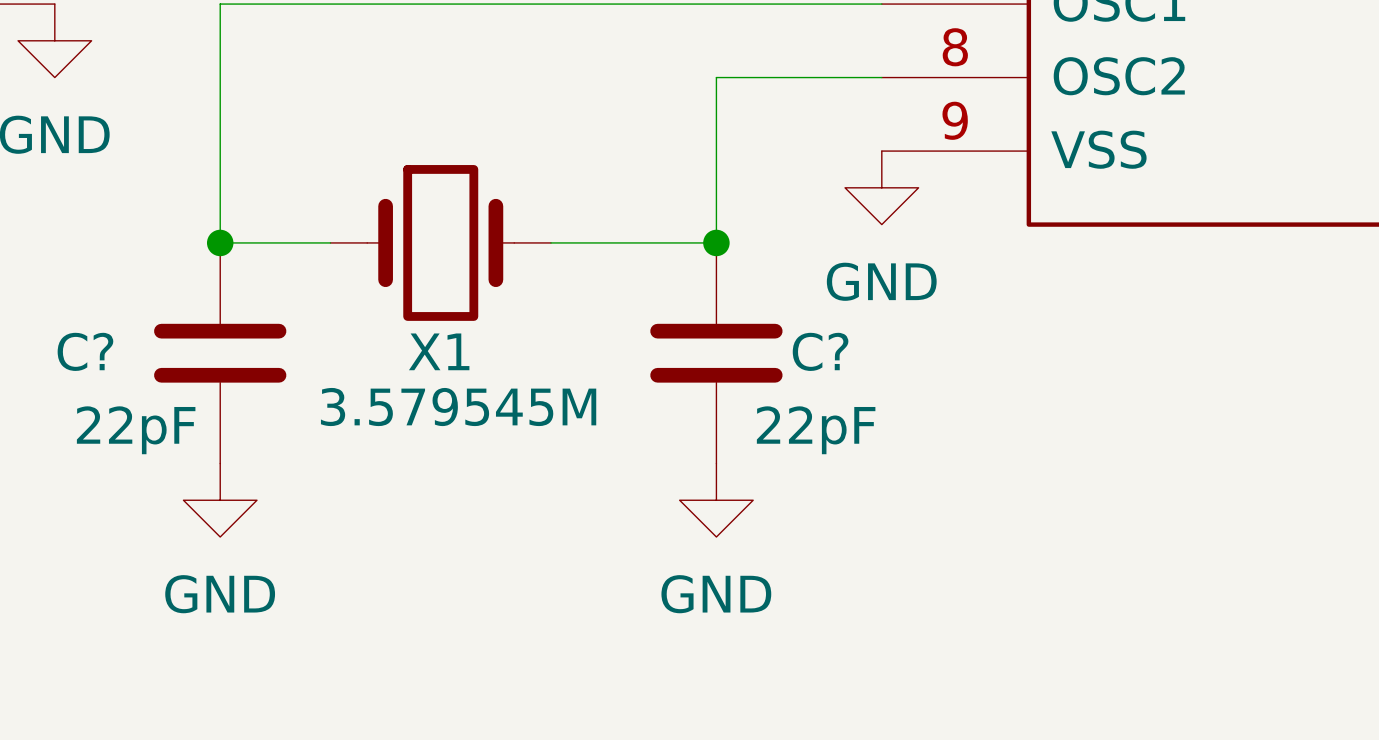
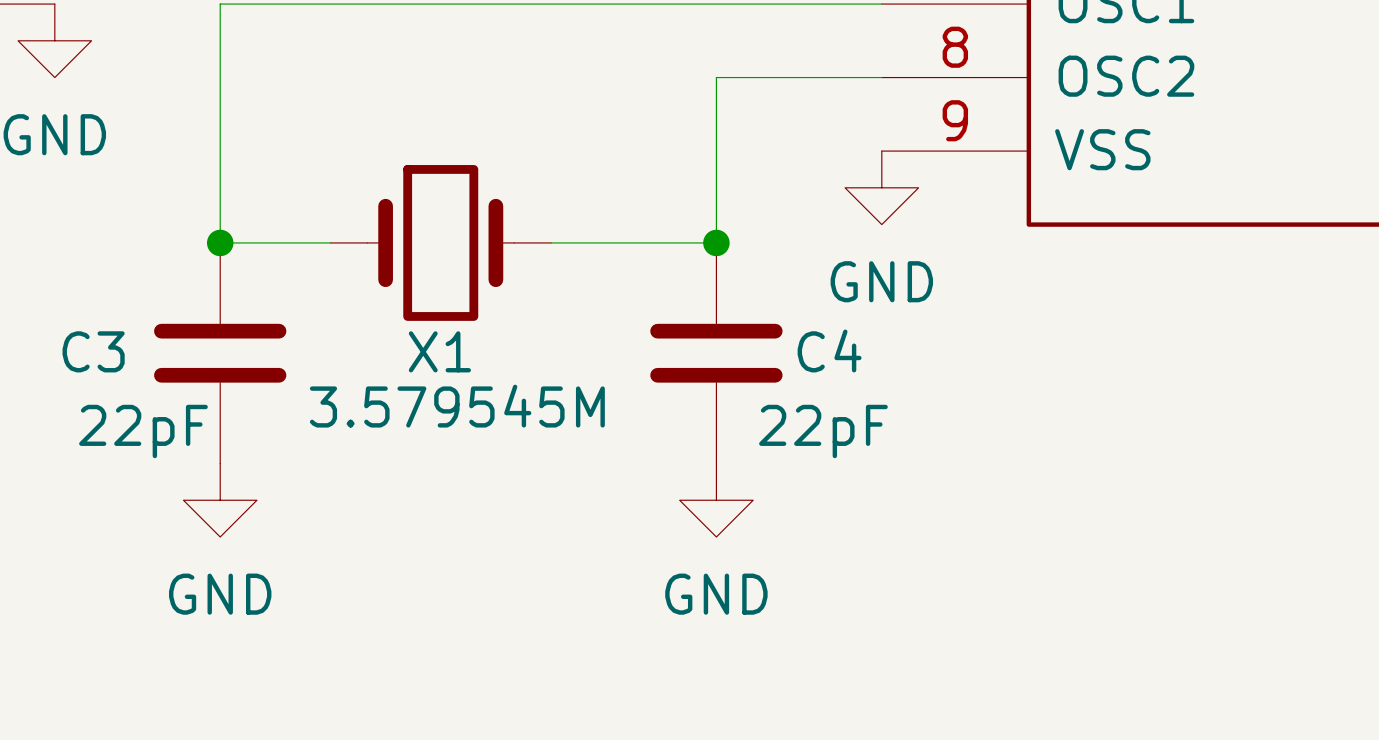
C? name: C? (85, 351) -> C3 (93, 351)
C? name: C? (820, 351) -> C4 (829, 350)

